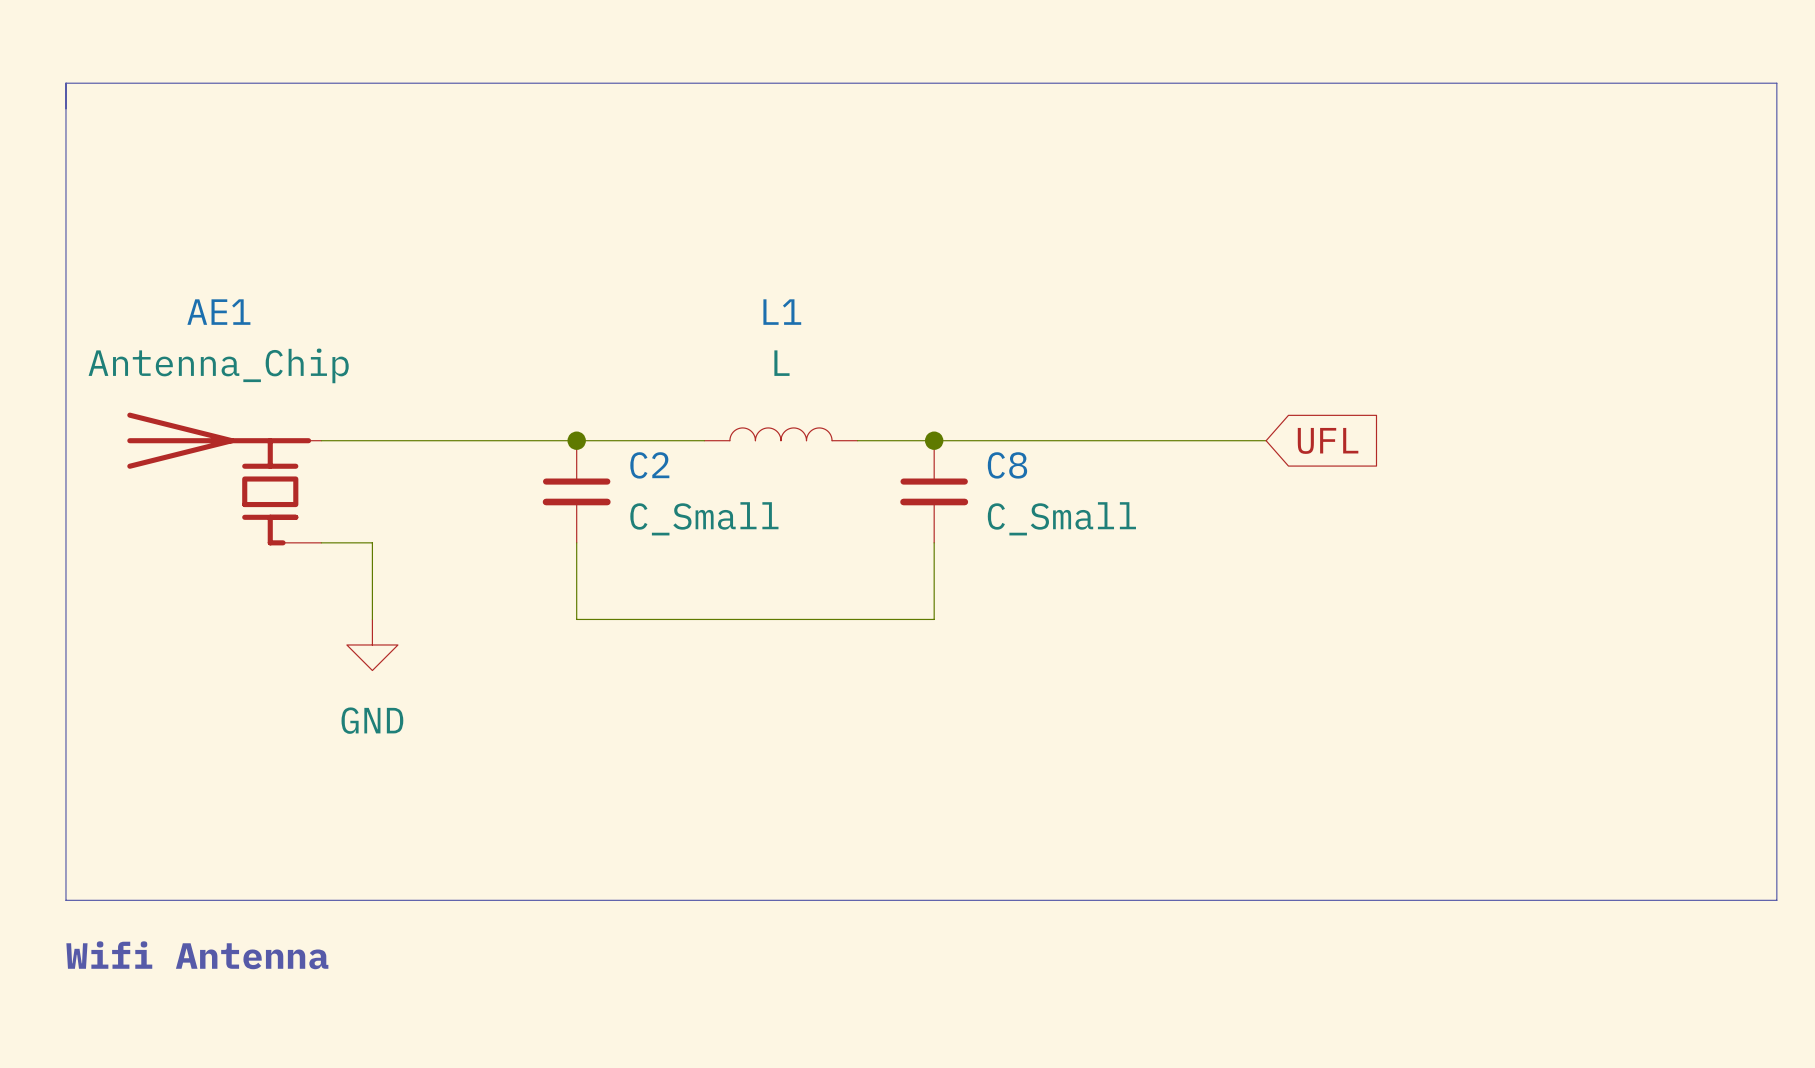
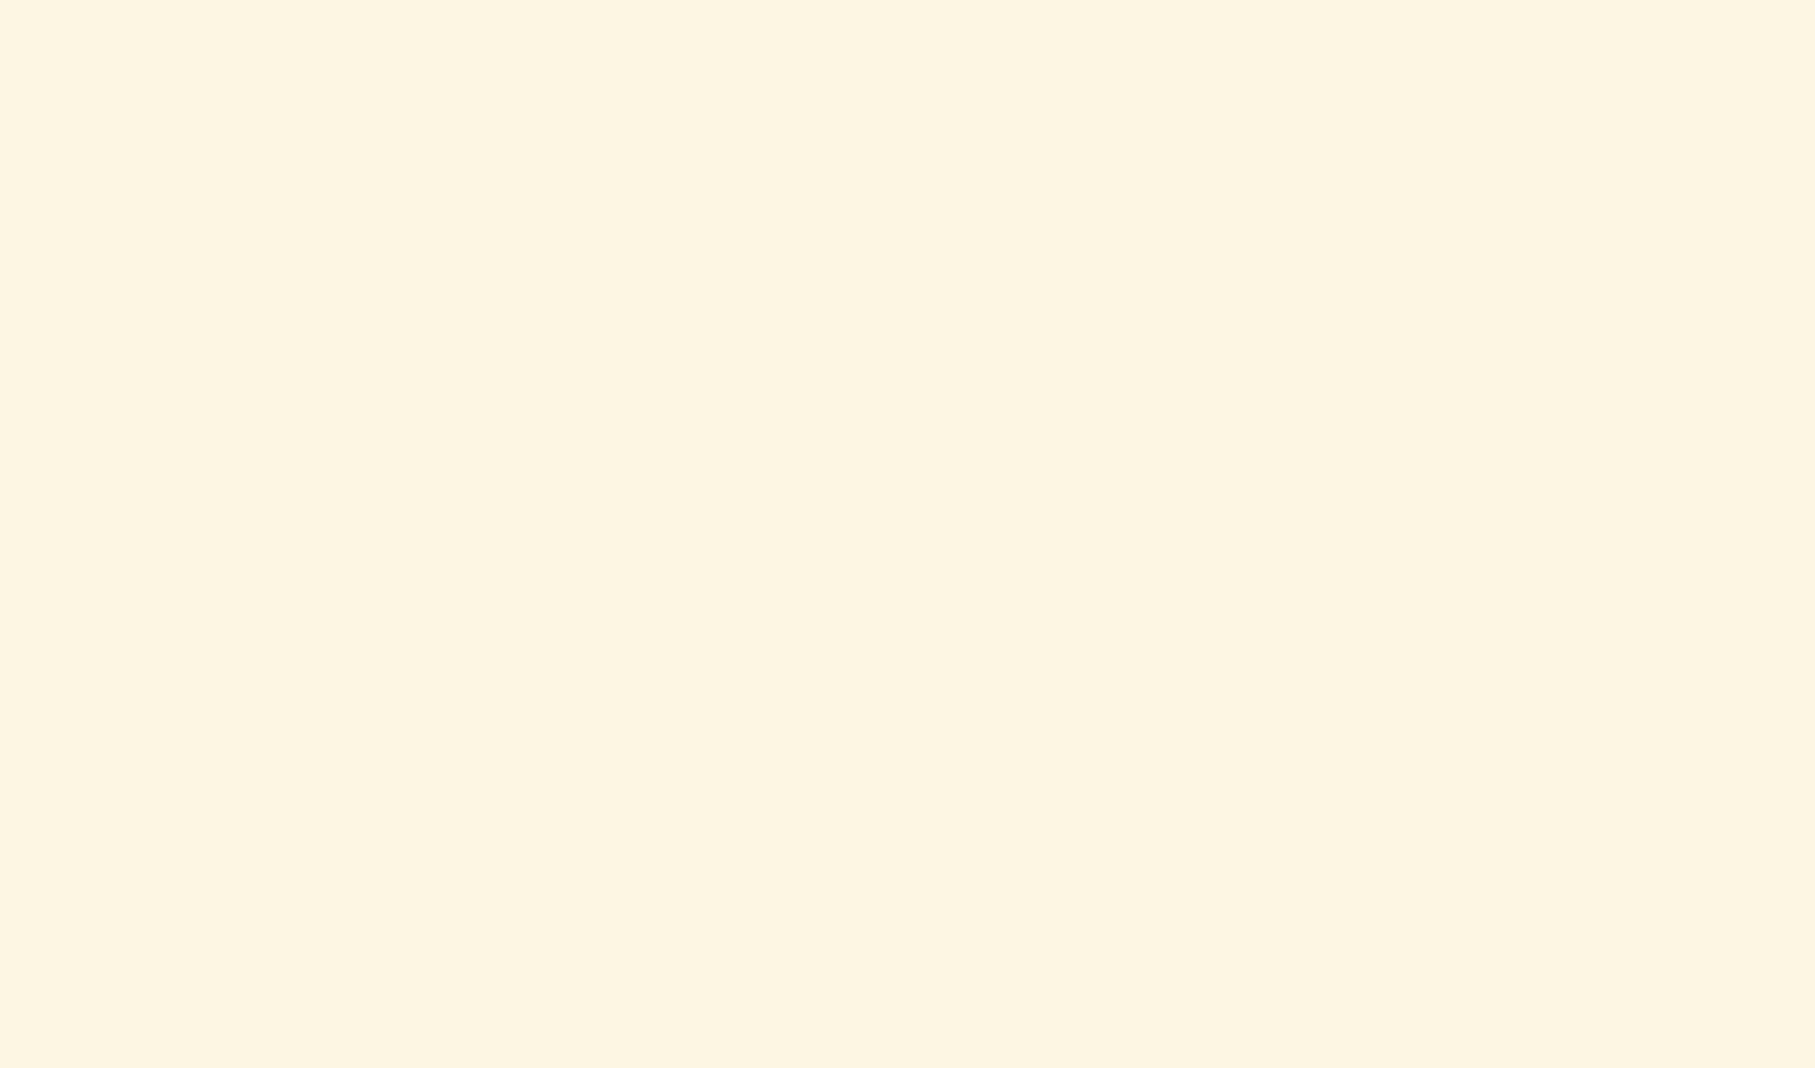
line: (65, 83) (65, 900) (1776, 900) (1776, 83) (65, 83) -> none
L1: L (780, 434) -> none
wire: (321, 440) (704, 440) -> none
junction: (576, 440) -> none
wire: (857, 440) (1266, 440) -> none
junction: (934, 440) -> none
global label: UFL (1328, 440) -> none
AE1: Antenna_Chip (224, 479) -> none
C2: C_Small (576, 491) -> none
C8: C_Small (934, 491) -> none
wire: (321, 542) (372, 542) (372, 619) -> none
wire: (576, 542) (576, 619) (934, 619) (934, 542) -> none
power symbol: GND (372, 644) -> none
text: Wifi Antenna (197, 955) -> none

